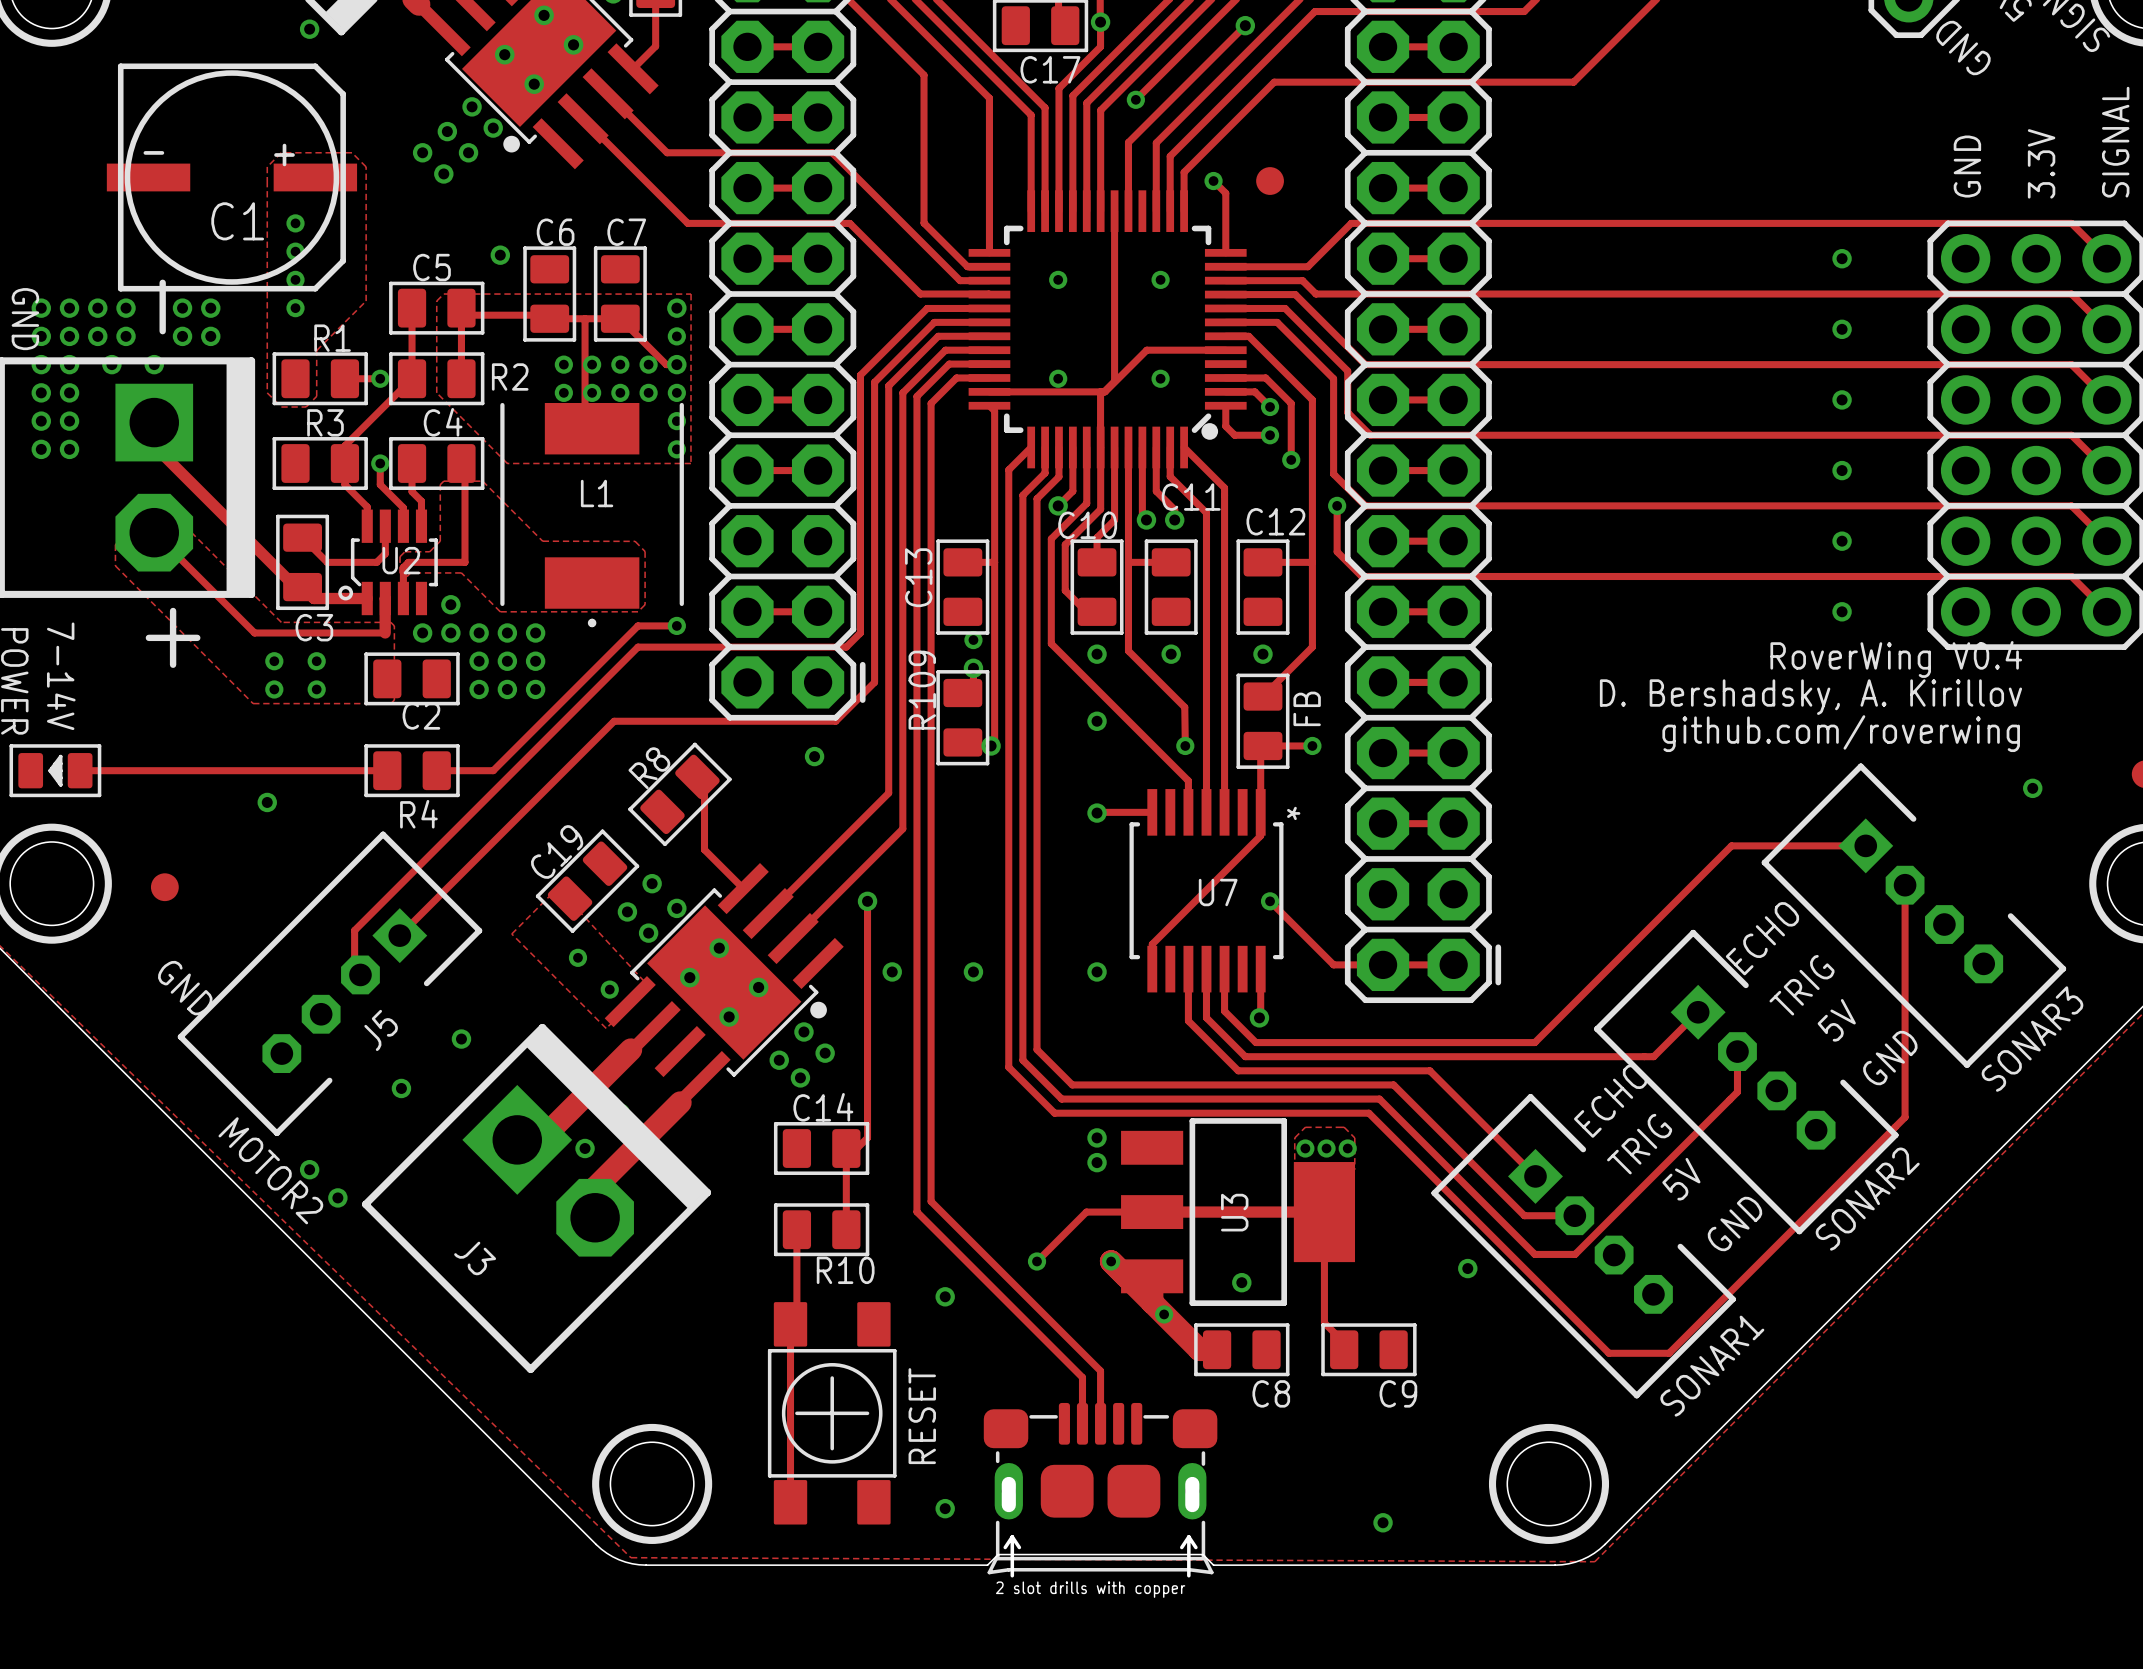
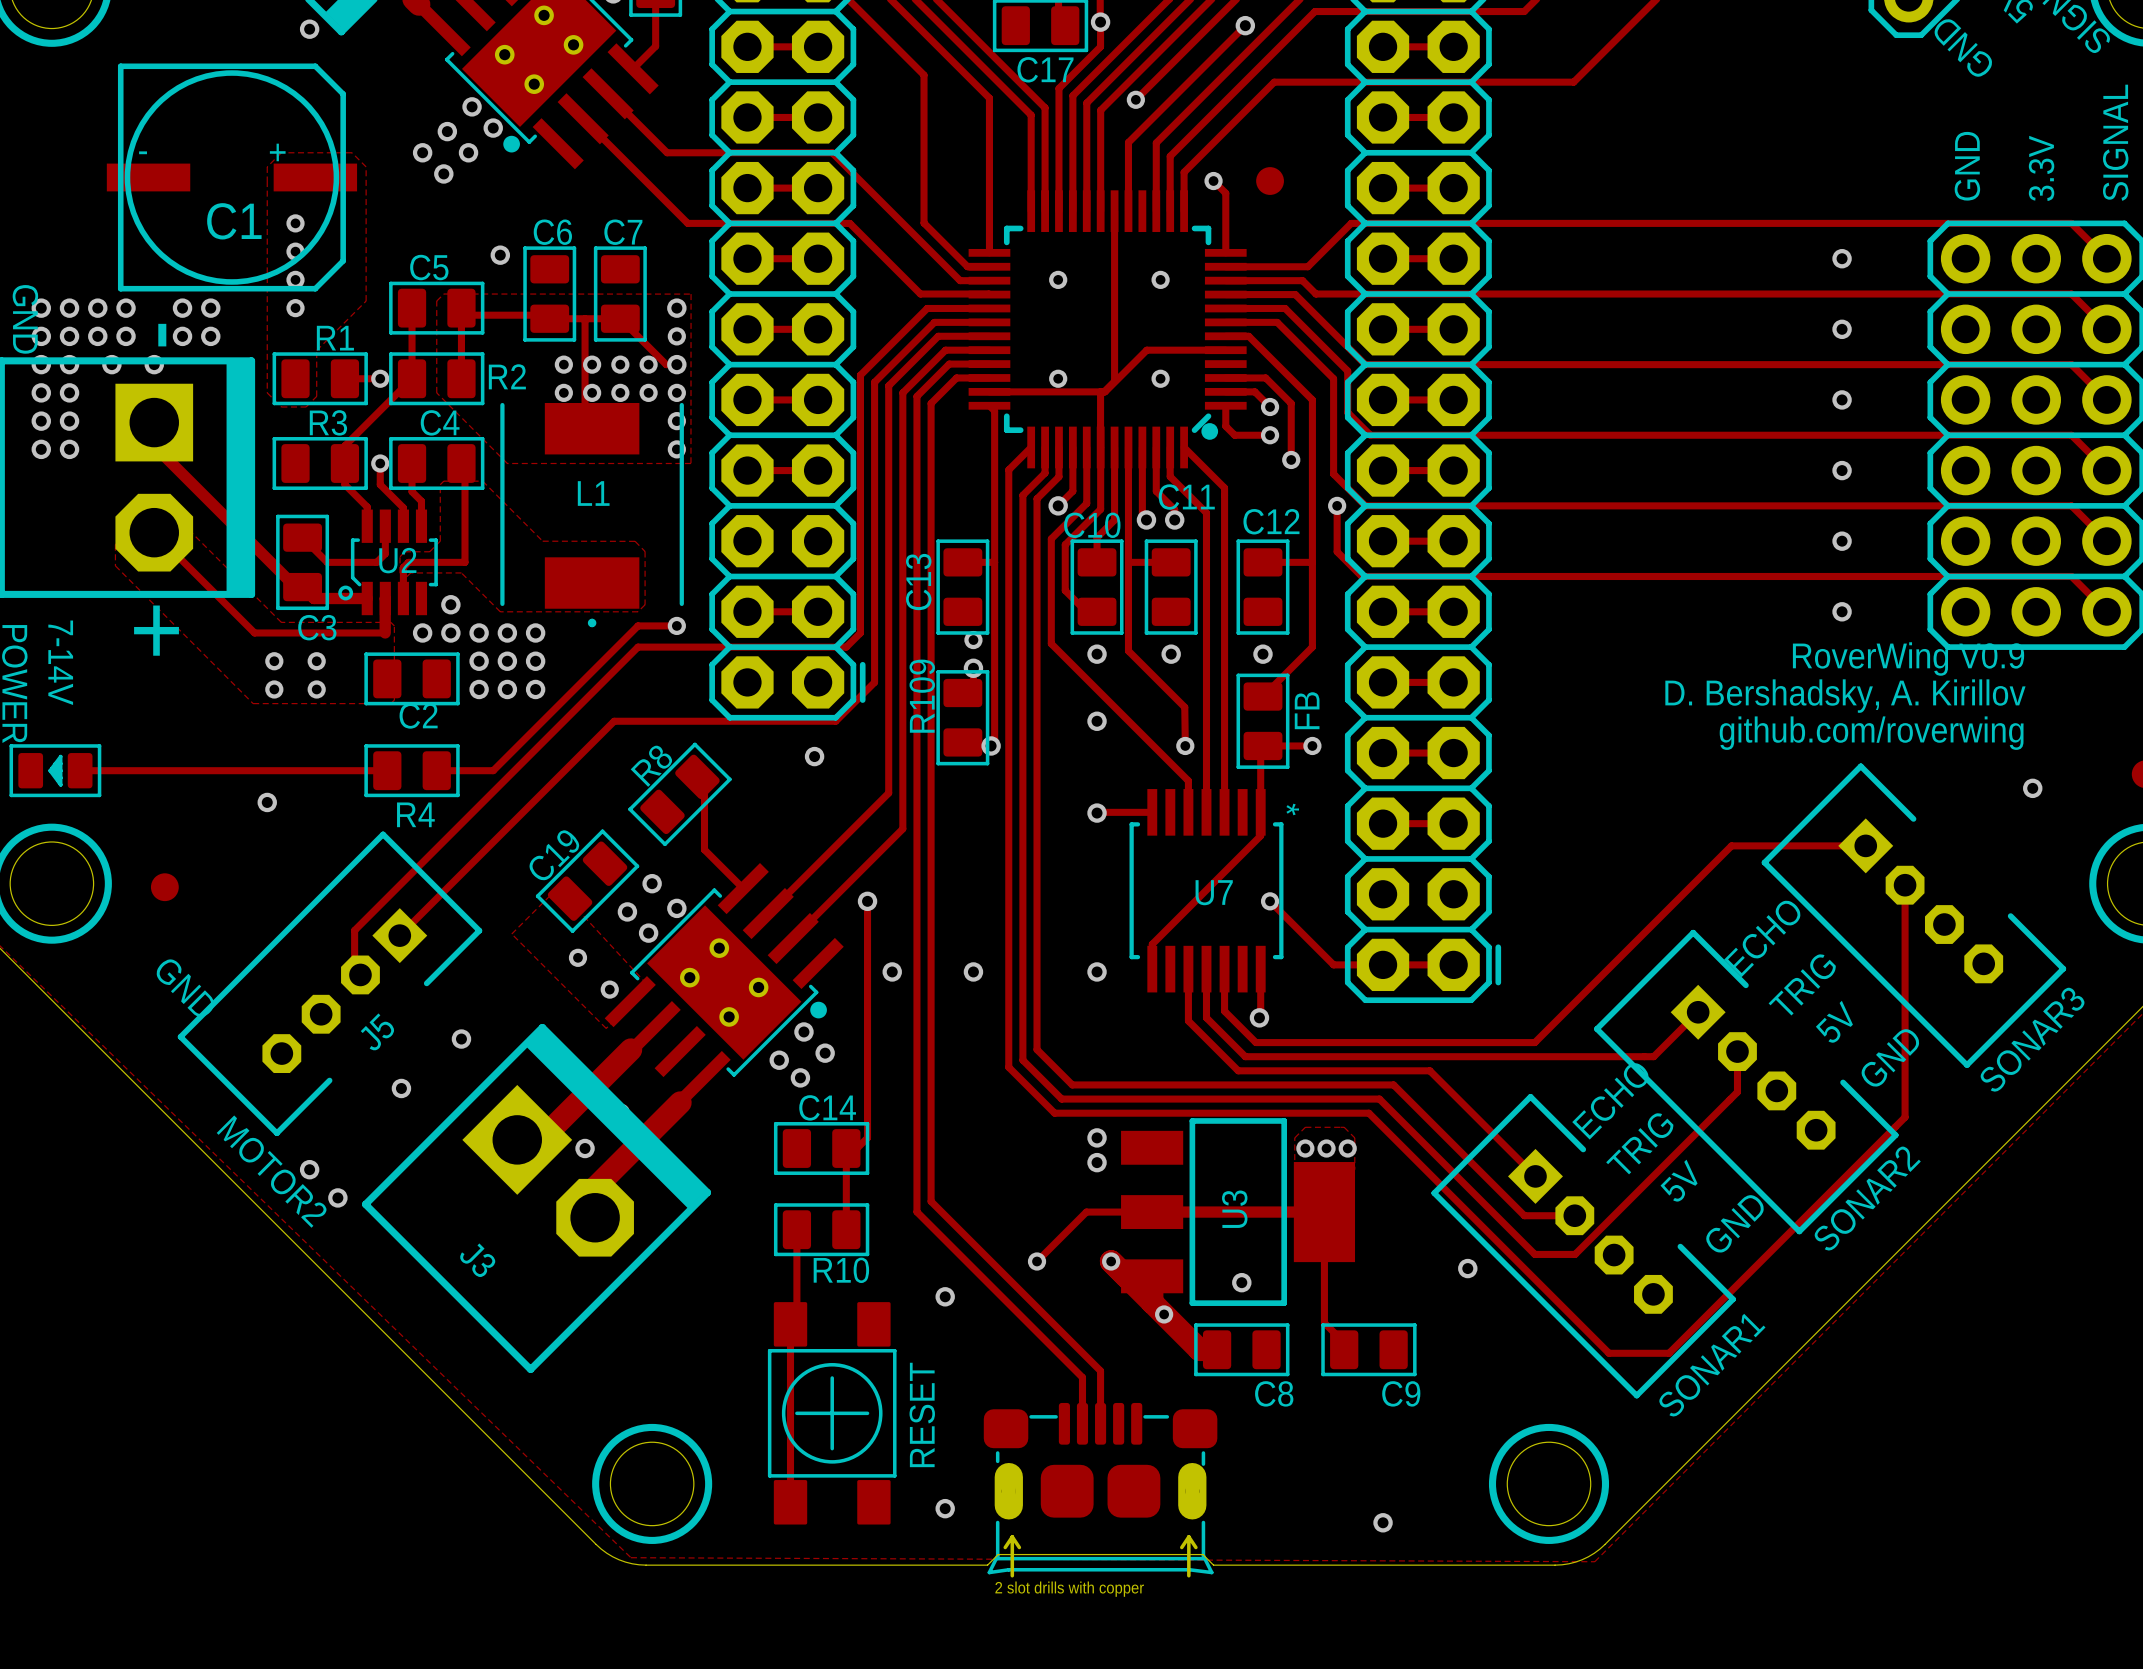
text: RoverWing V0.4 (1896, 659) -> RoverWing V0.9 (1908, 659)

